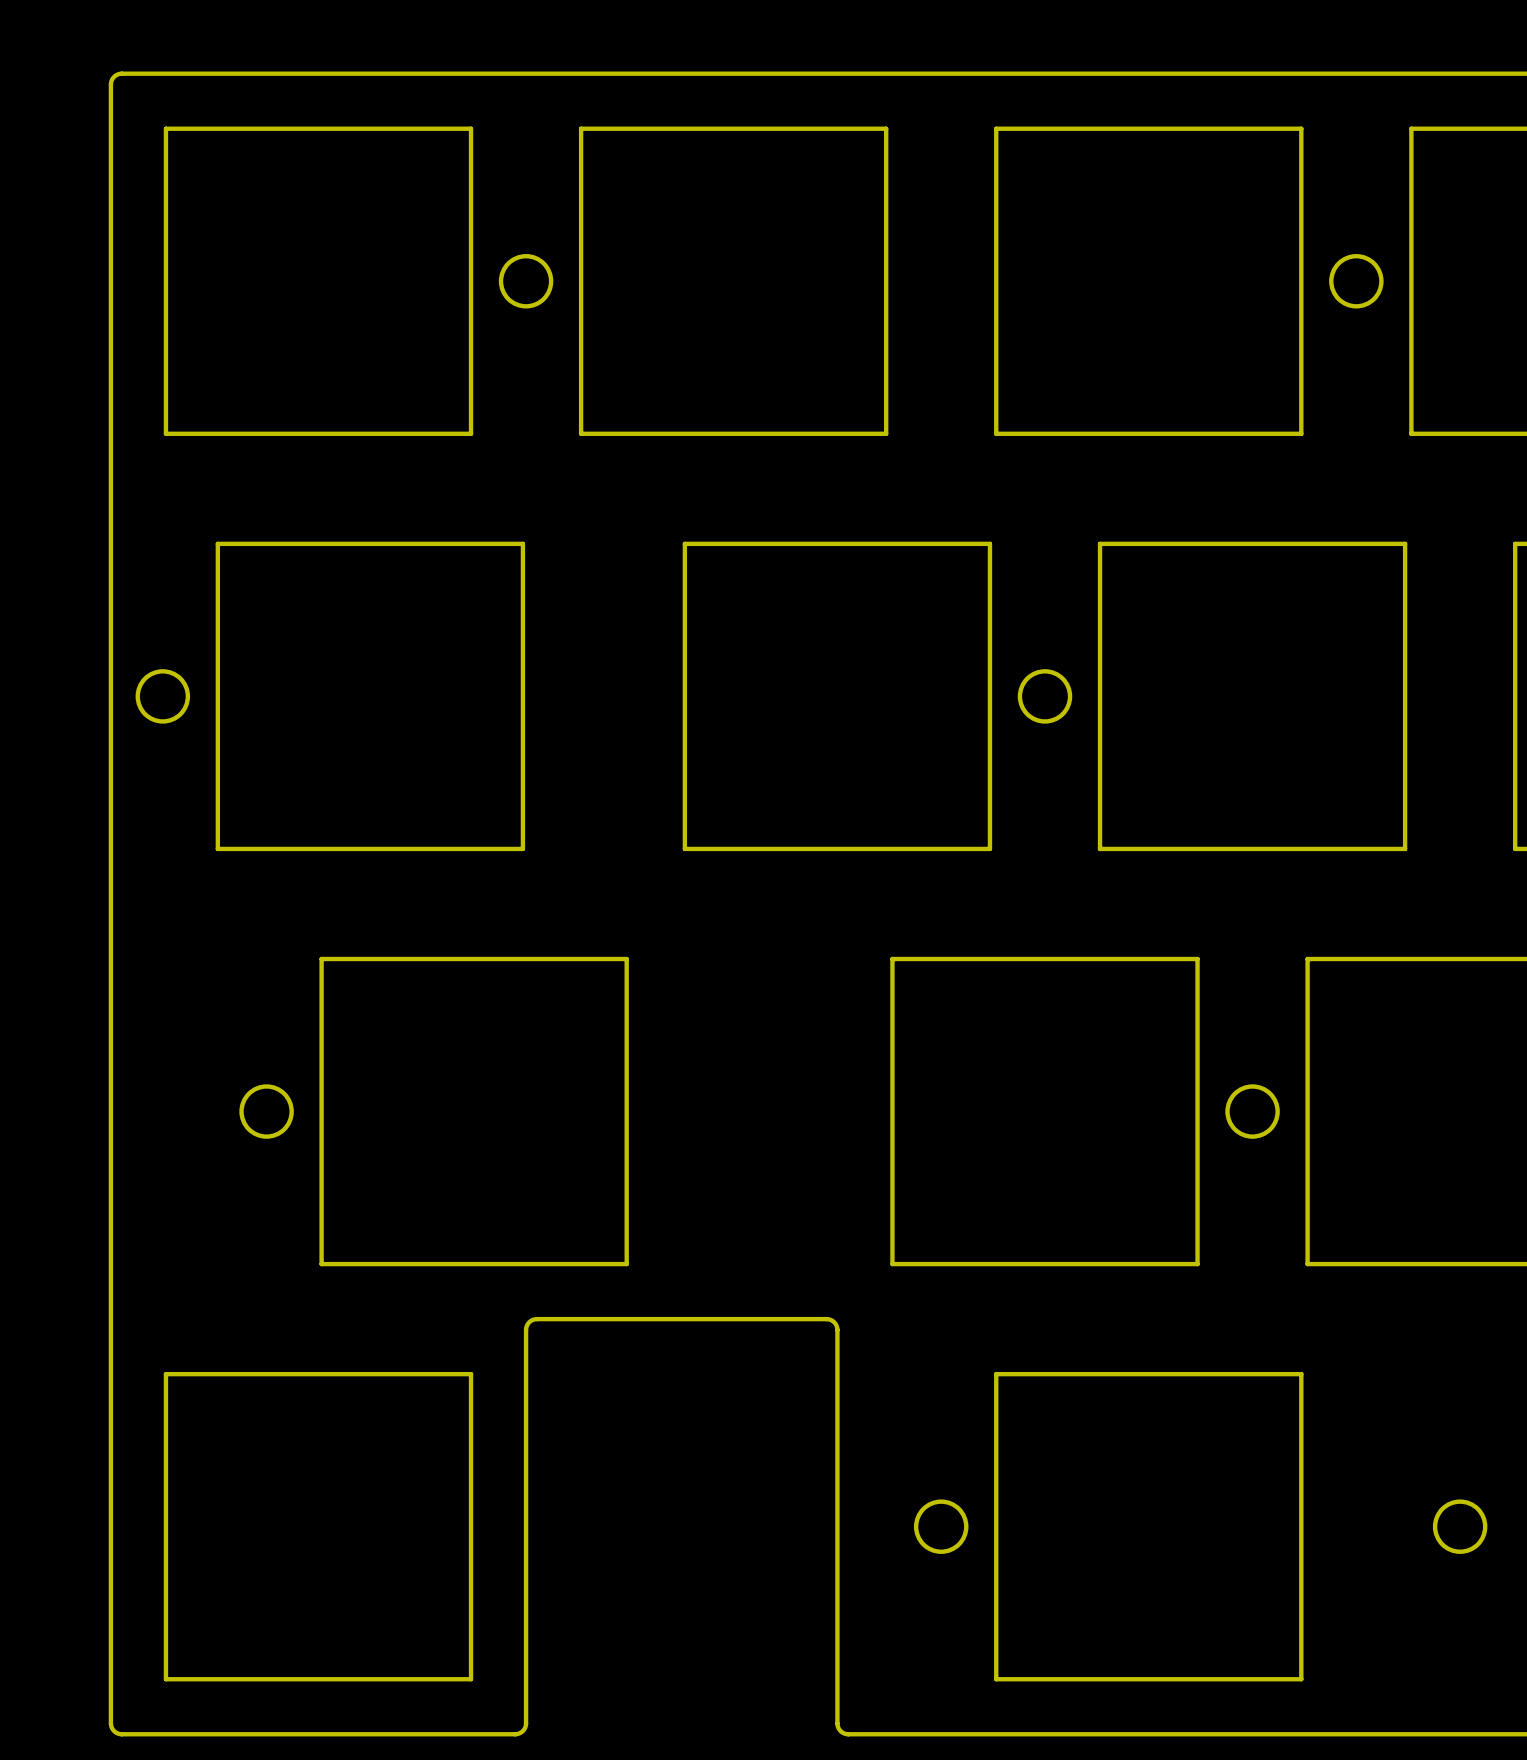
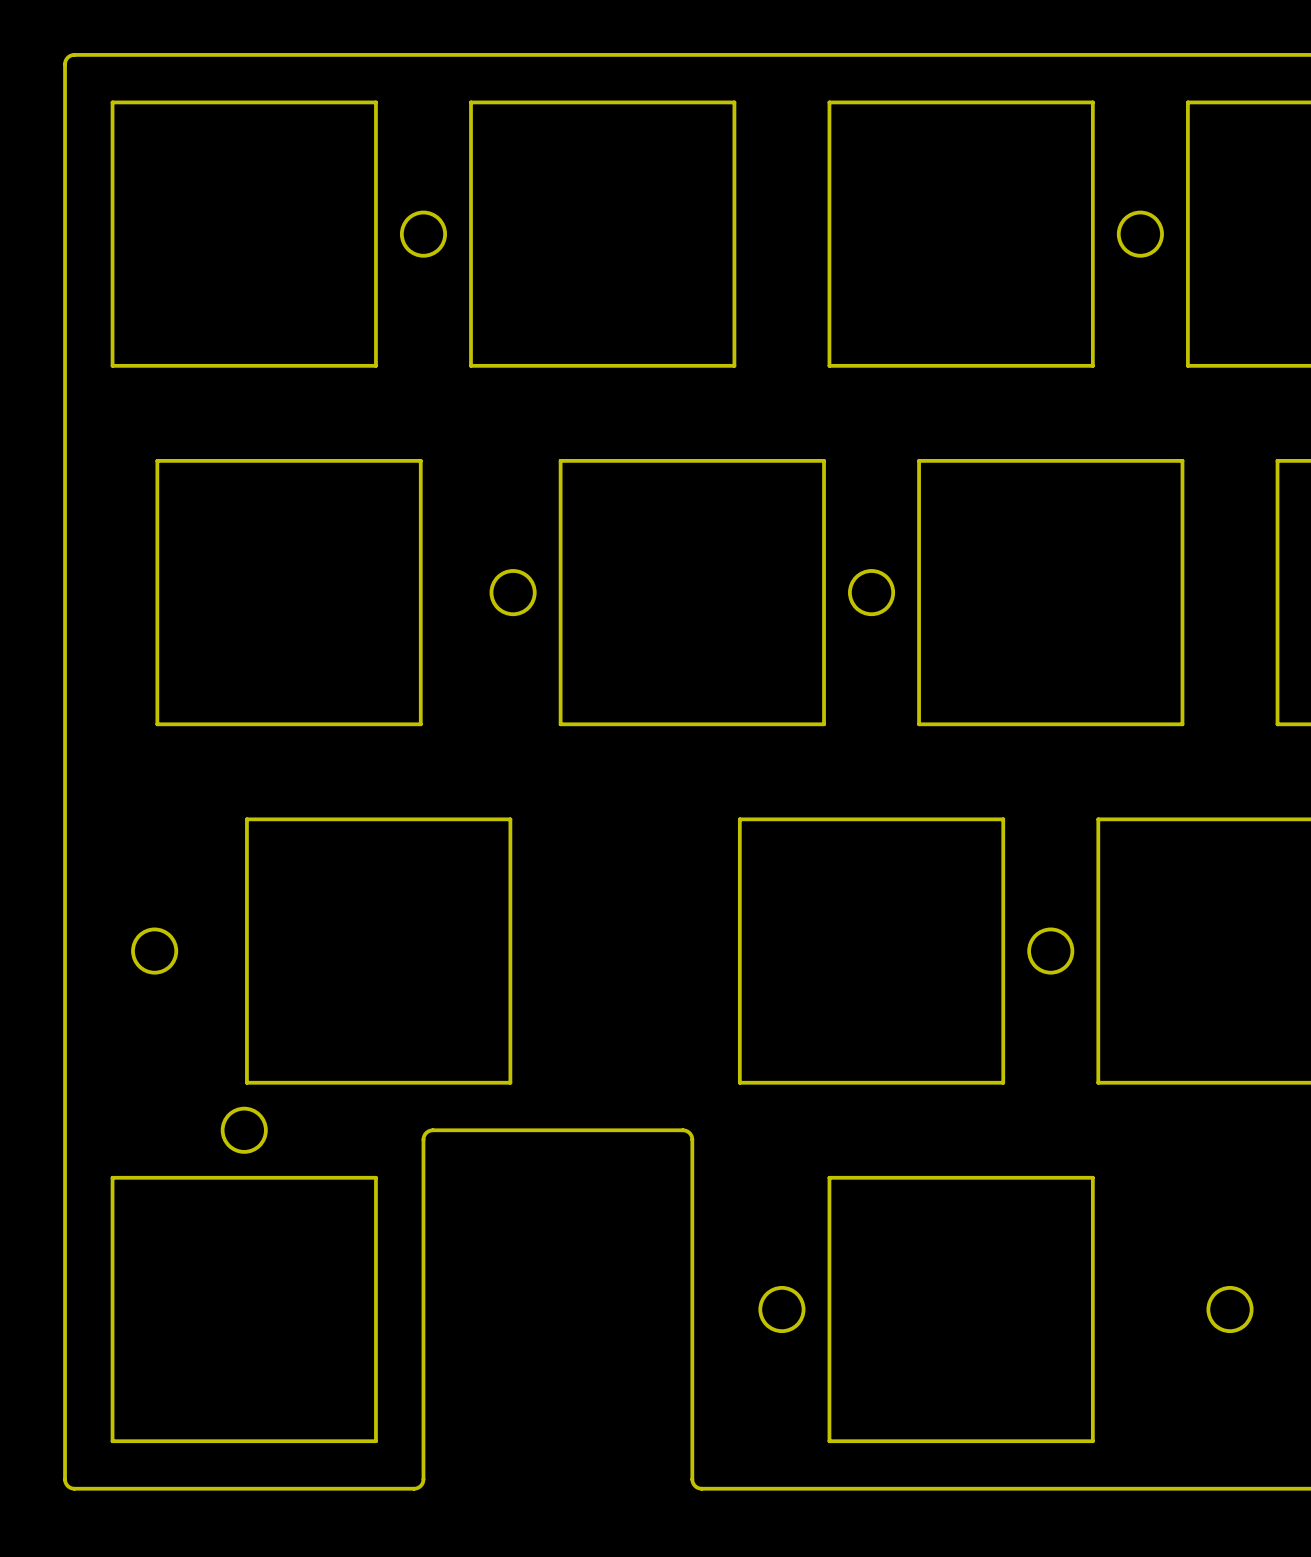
round board edge: [135, 669, 191, 724] -> none
round board edge: none -> [489, 569, 537, 617]
round board edge position: (266, 1111) -> (154, 951)
round board edge: none -> [220, 1106, 268, 1154]

